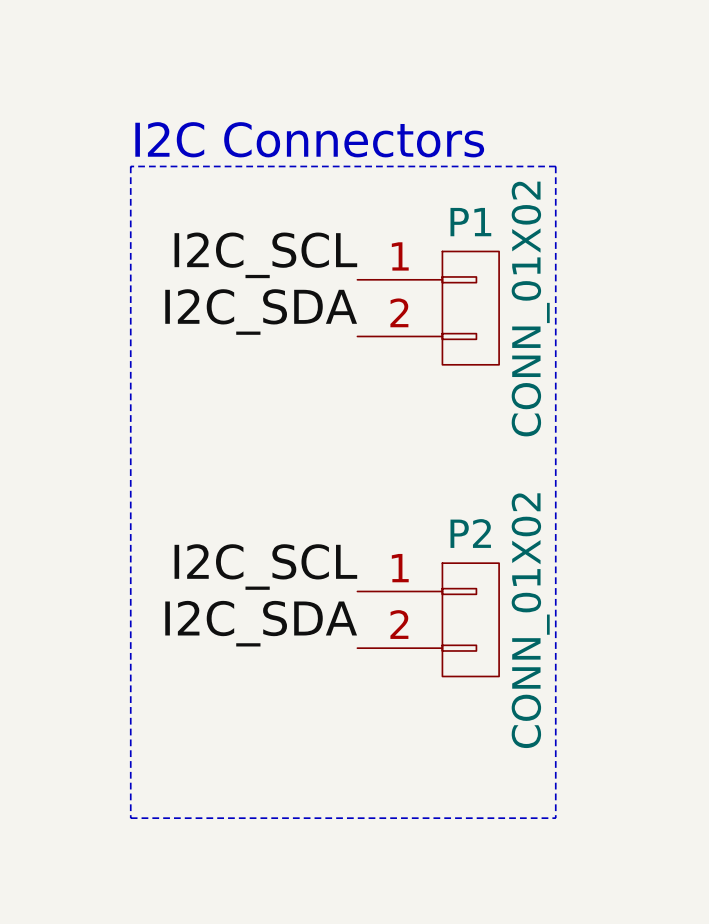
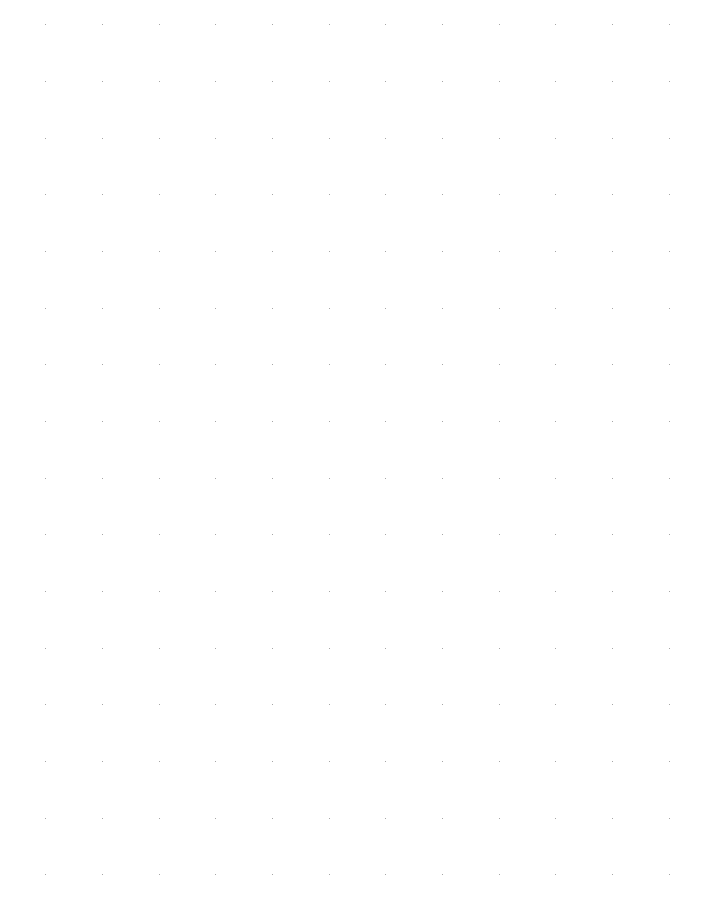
text: I2C Connectors (309, 139) -> none
line: (130, 166) (555, 166) (555, 818) (130, 818) (130, 166) -> none
label: I2C_SCL (265, 255) -> none
P1: CONN_01X02 (428, 308) -> none
label: I2C_SDA (261, 312) -> none
label: I2C_SCL (265, 567) -> none
P2: CONN_01X02 (428, 619) -> none
label: I2C_SDA (261, 623) -> none

